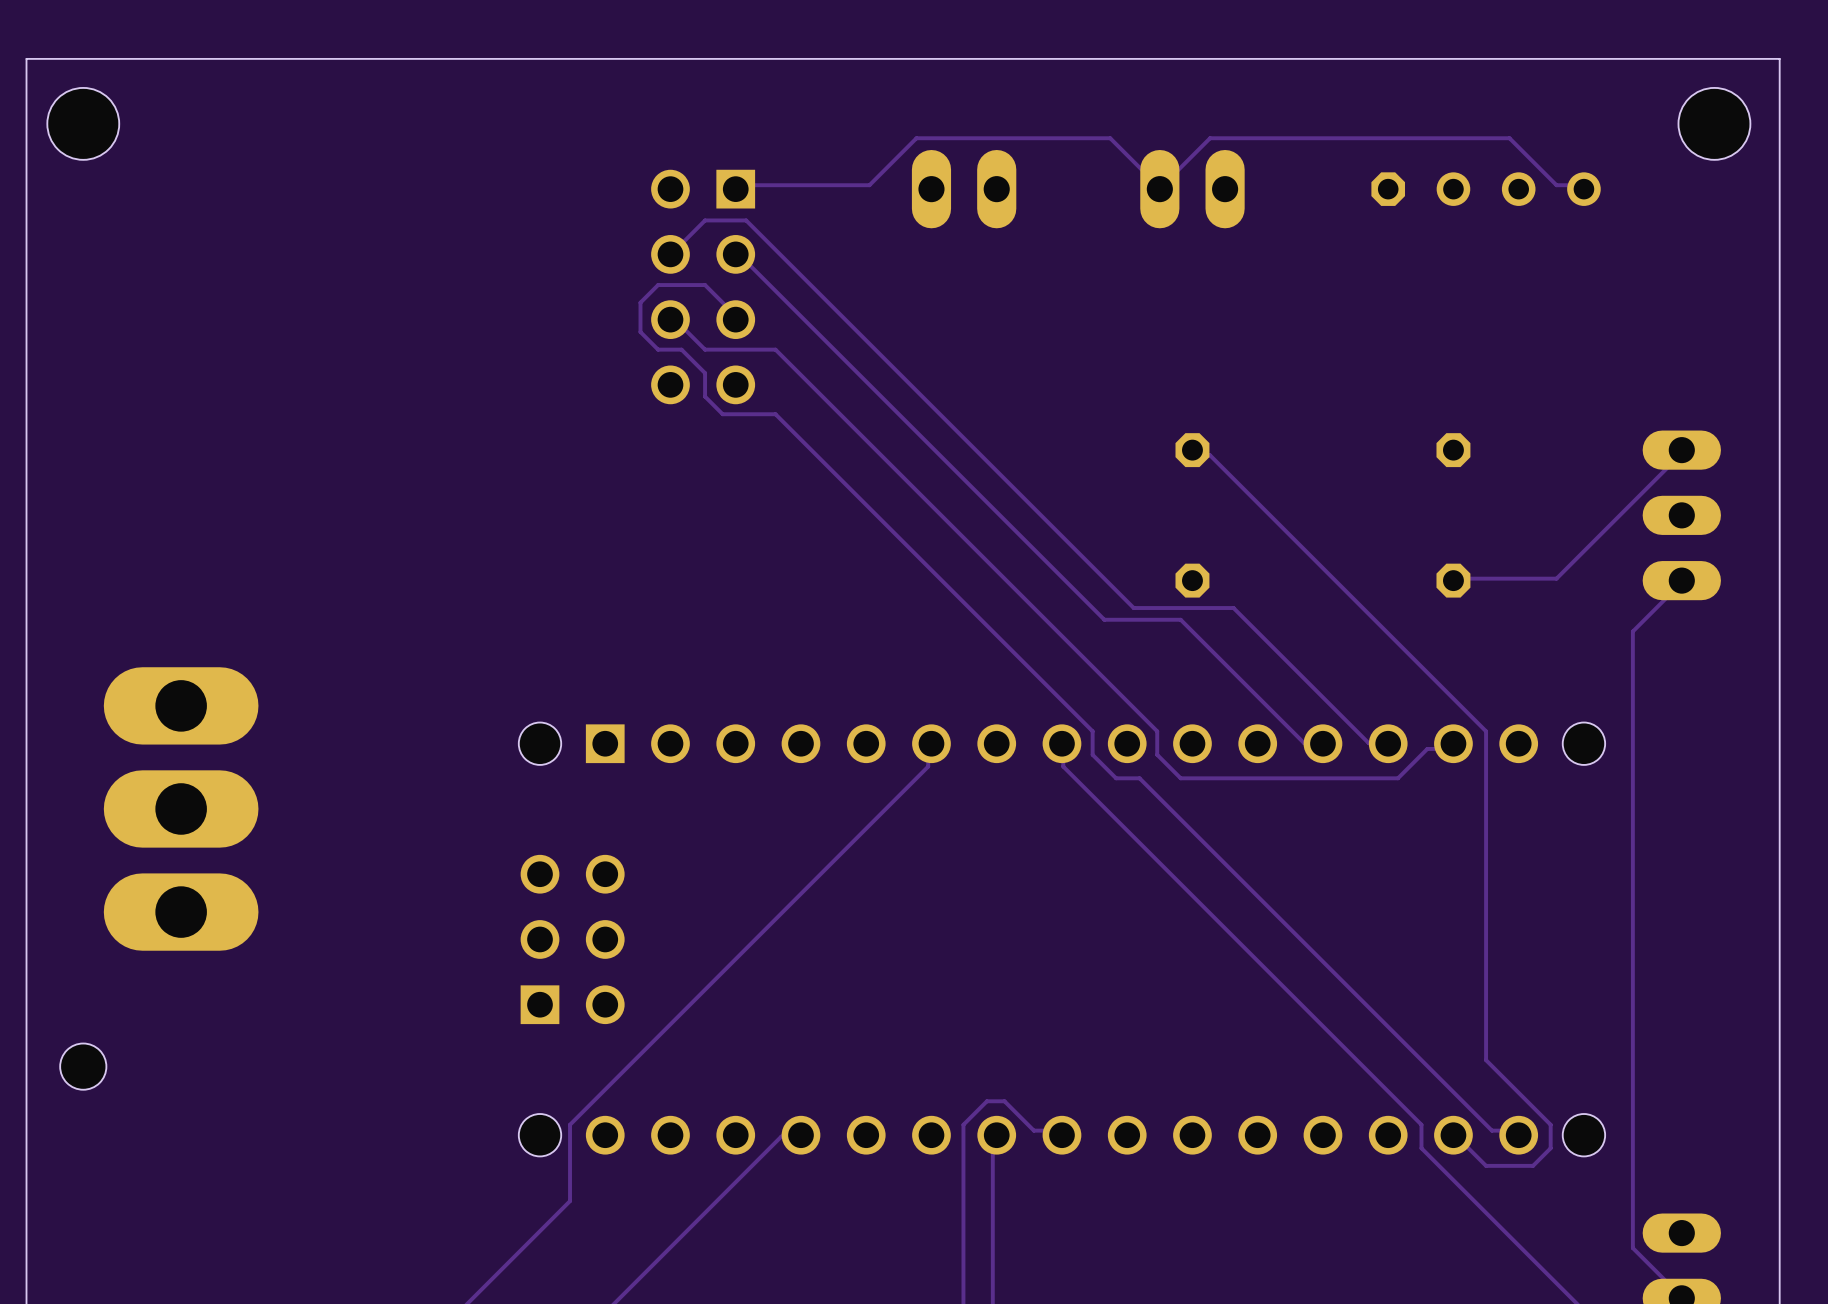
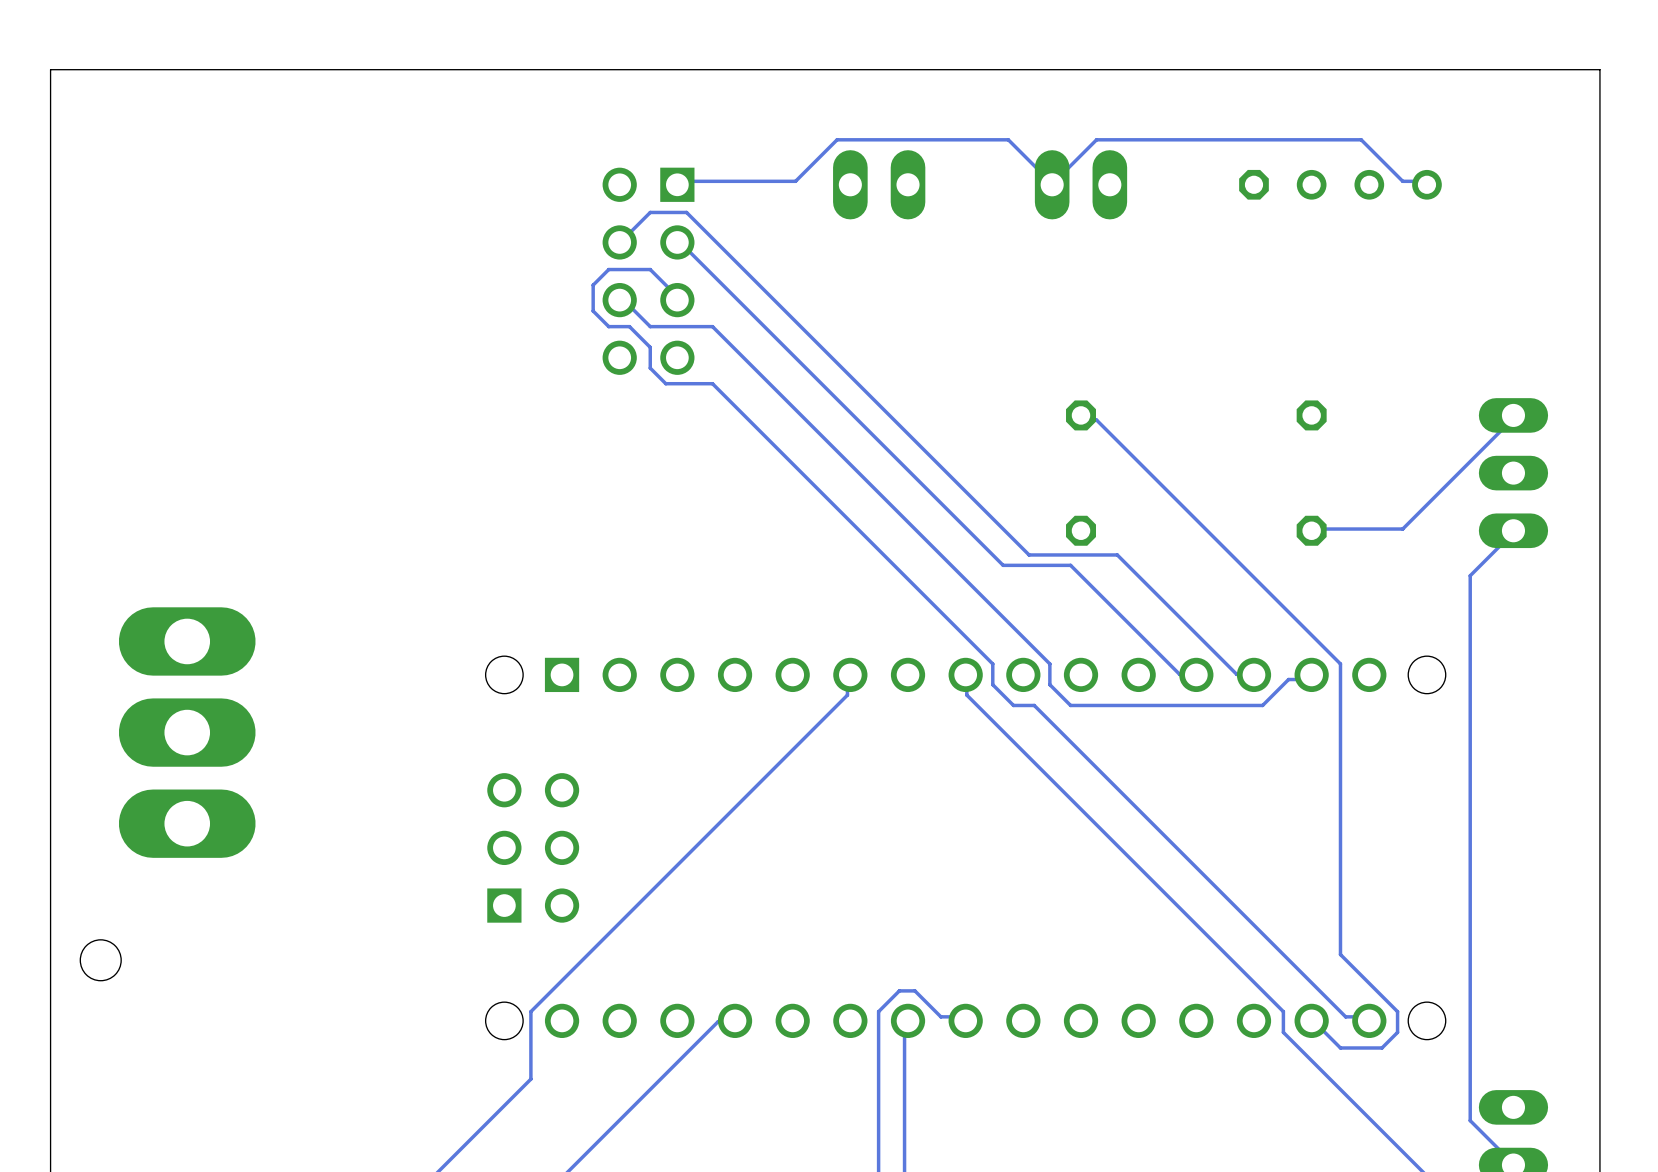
hole: (83, 123) -> none
hole: (1714, 123) -> none

